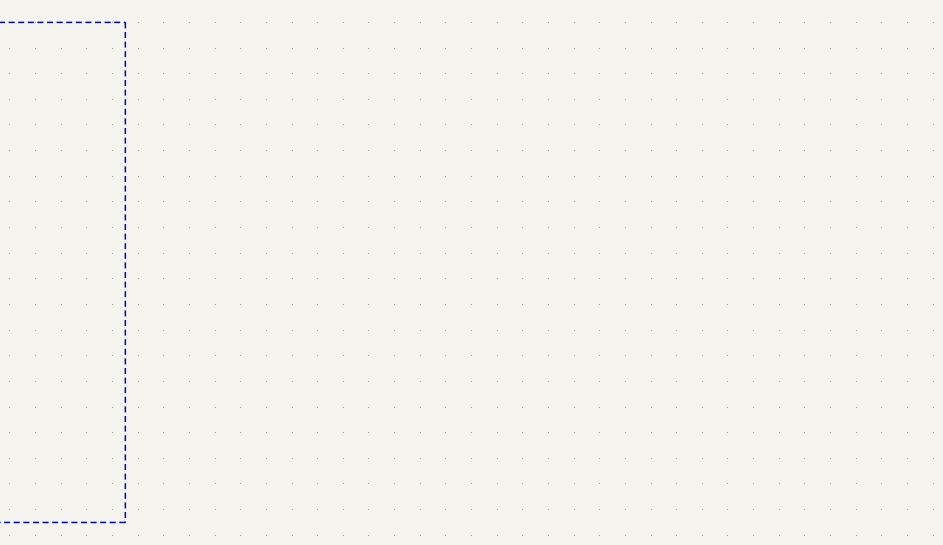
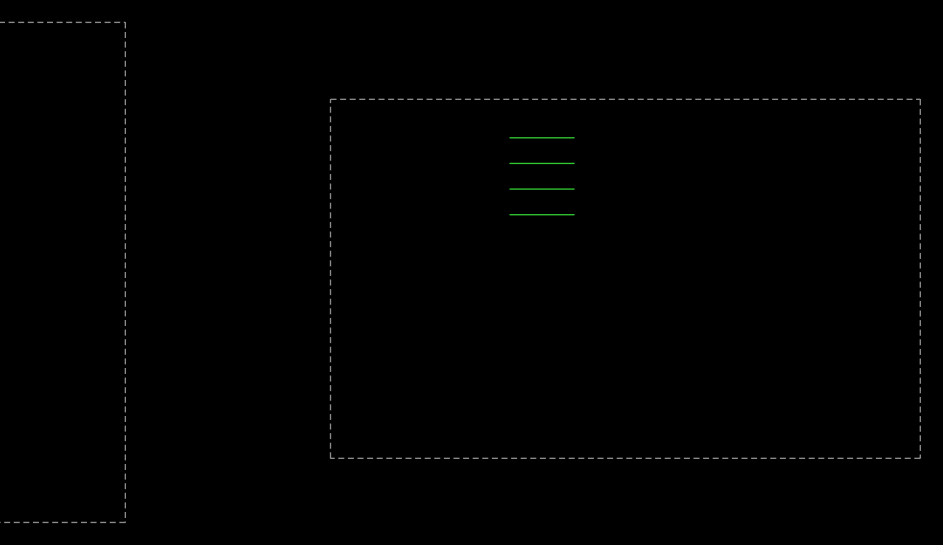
line: none -> (330, 99) (330, 458) (920, 458) (920, 99) (330, 99)
wire: none -> (510, 137) (574, 137)
wire: none -> (510, 163) (574, 163)
wire: none -> (510, 189) (574, 189)
wire: none -> (510, 214) (574, 214)

